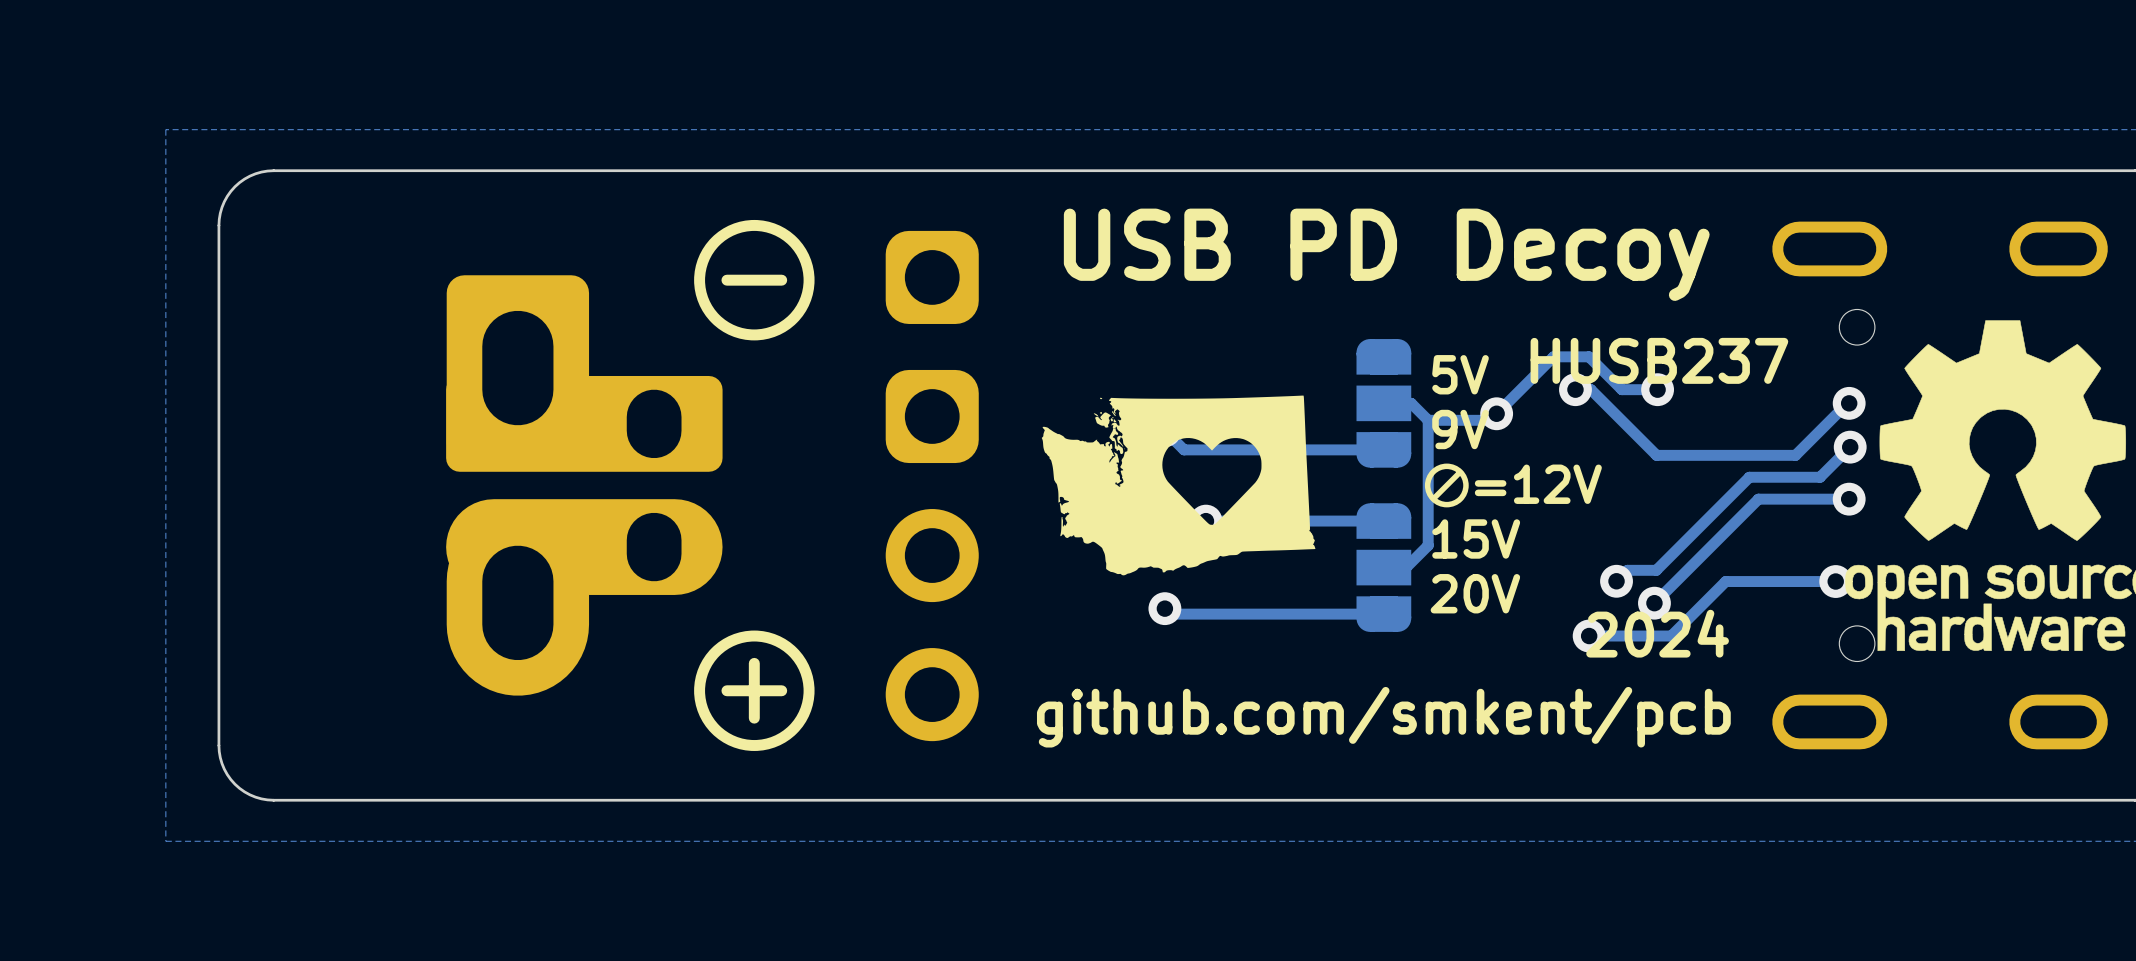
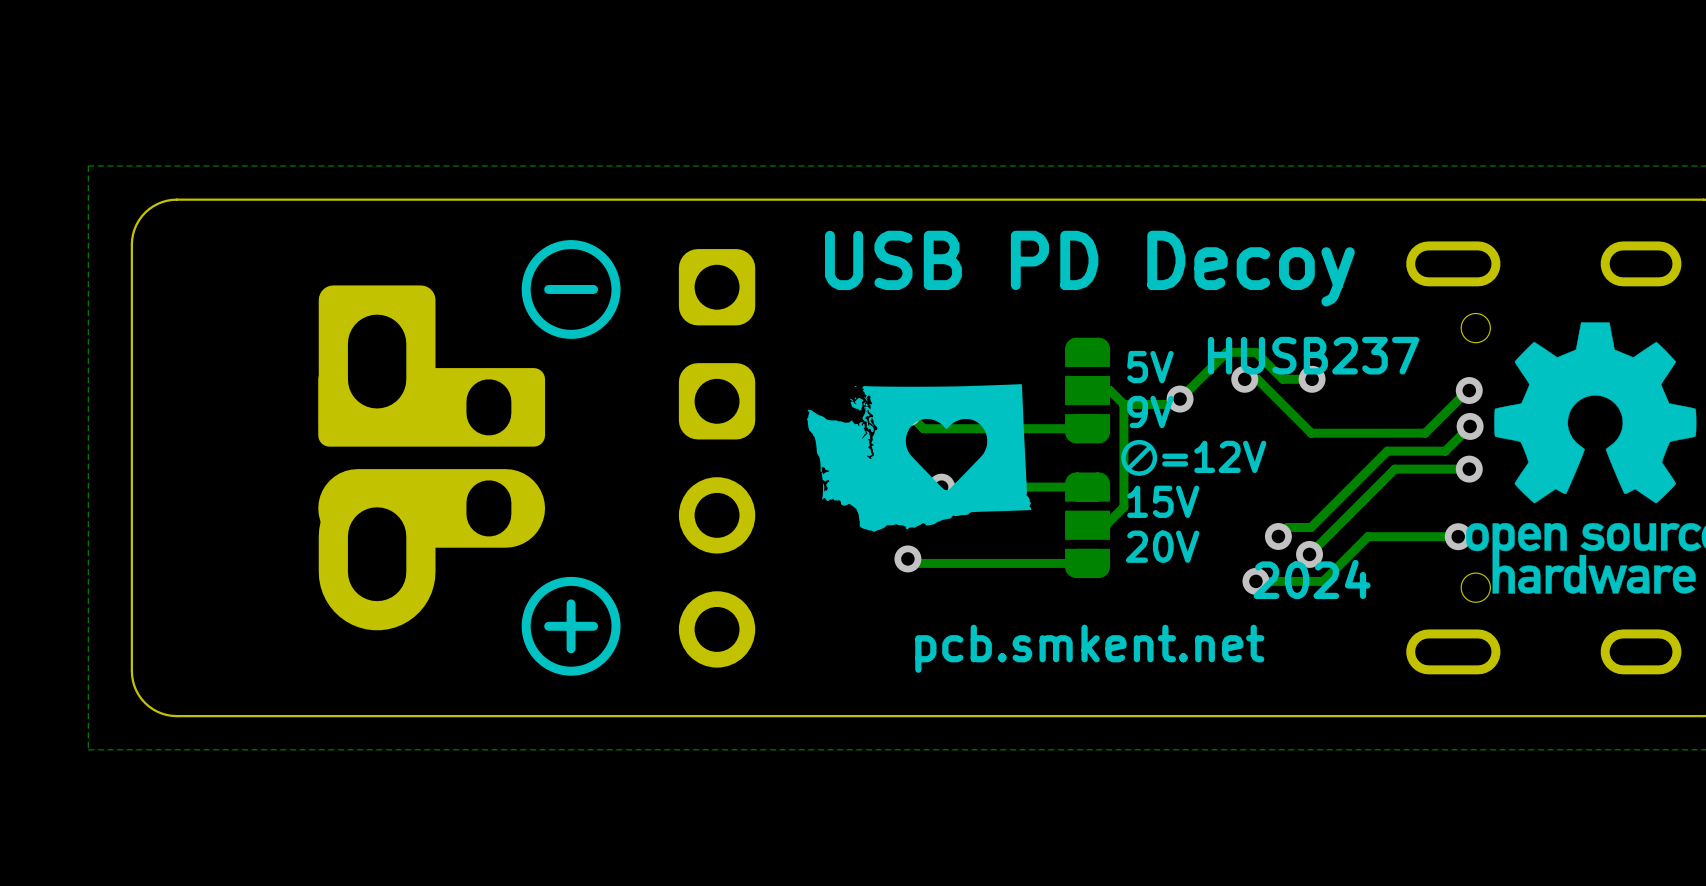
text: github.com/smkent/pcb (1383, 717) -> pcb.smkent.net (1089, 648)

